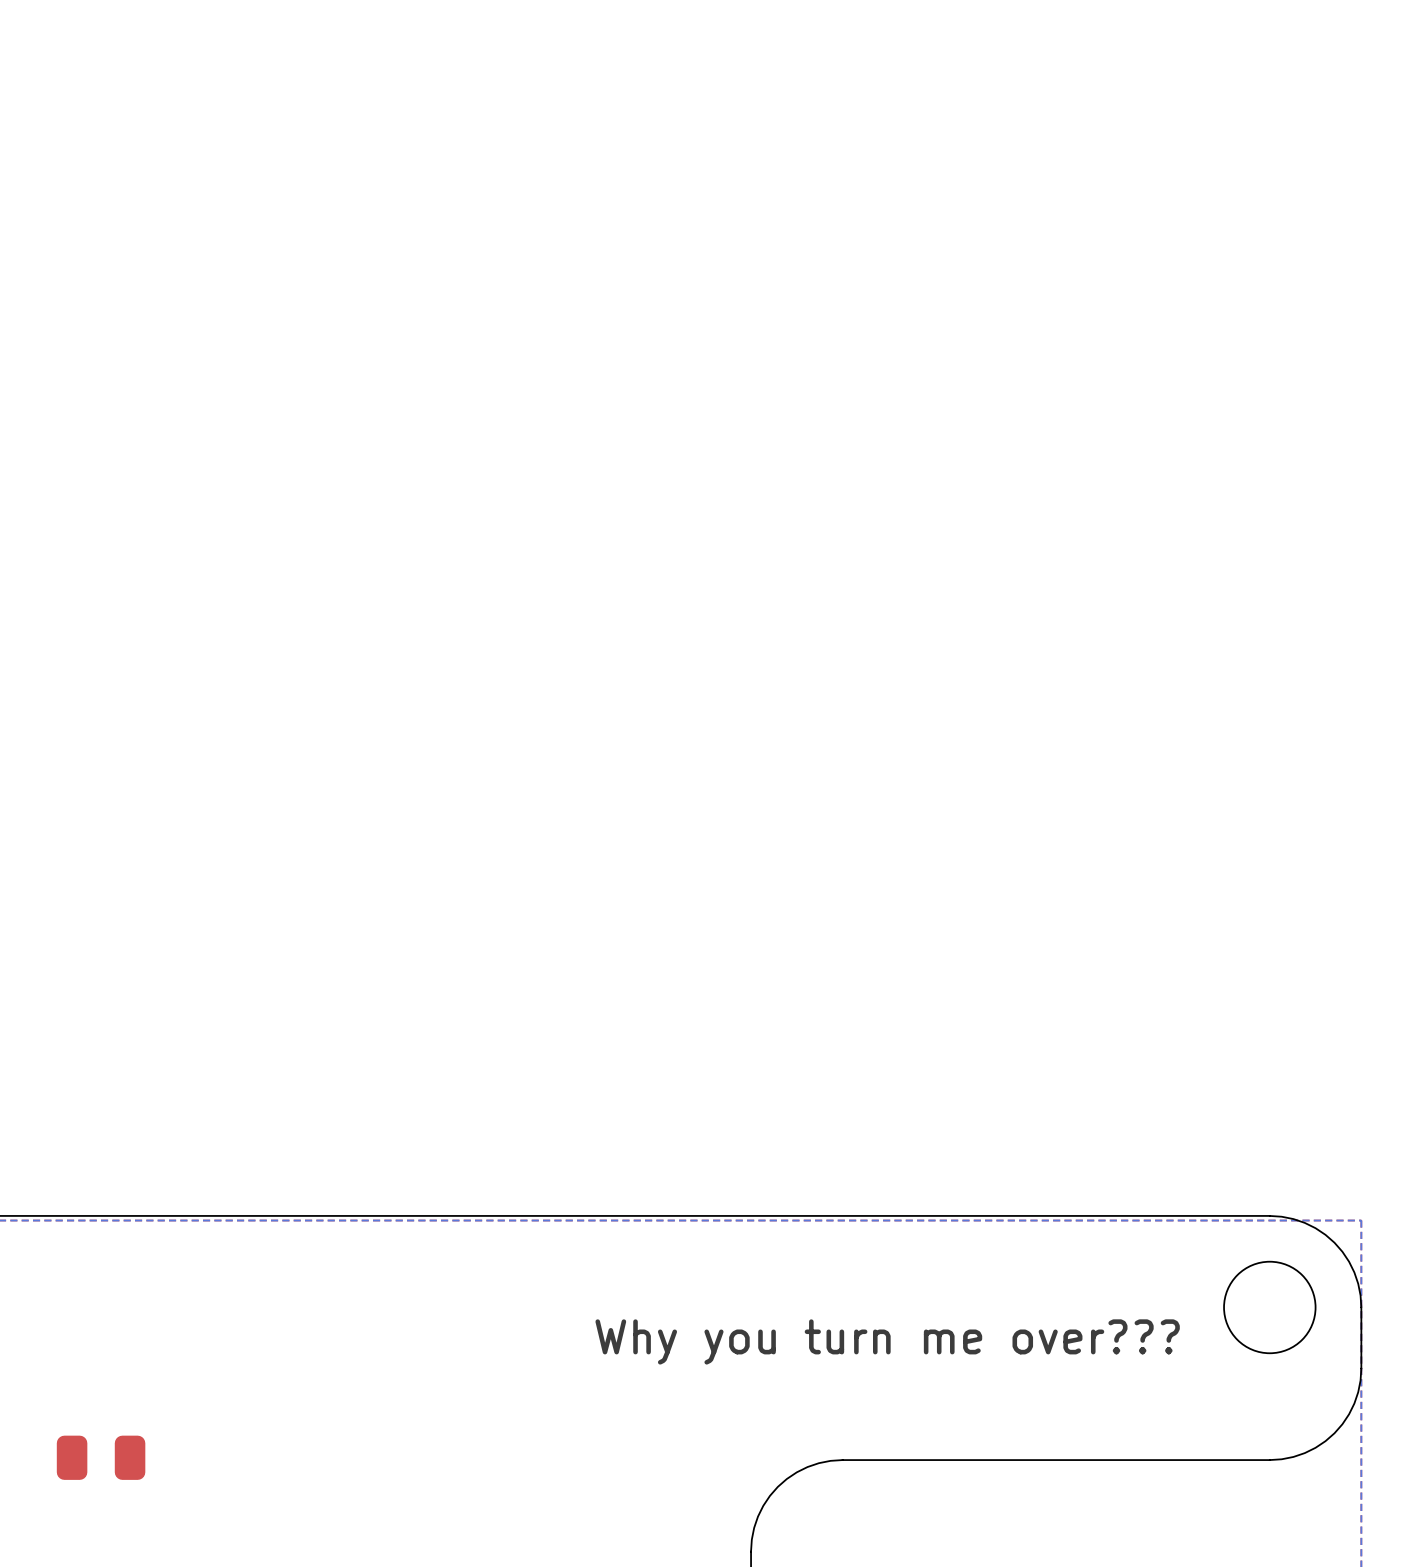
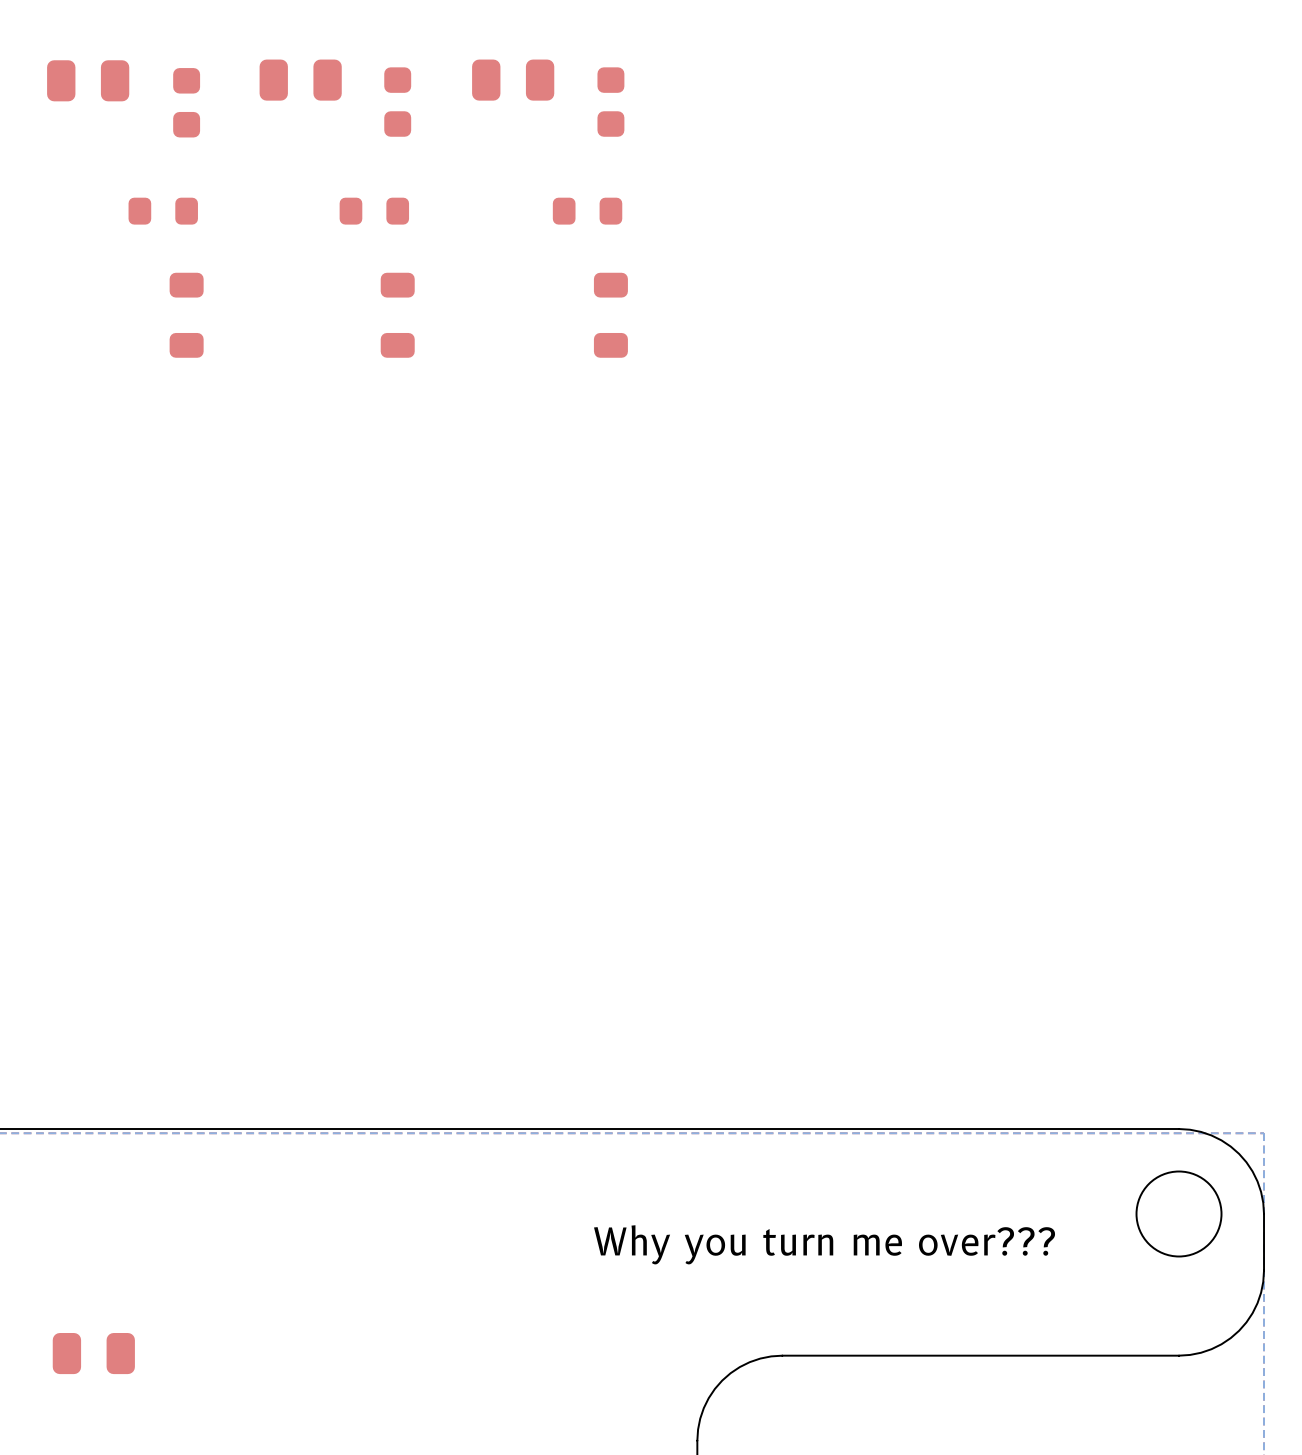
part: none -> (300, 80)
part: none -> (513, 80)
part: none -> (88, 80)
part: none -> (397, 102)
part: none -> (610, 102)
part: none -> (186, 102)
part: none -> (163, 211)
part: none -> (374, 211)
part: none -> (587, 211)
part: none -> (186, 315)
part: none -> (397, 315)
part: none -> (610, 315)

